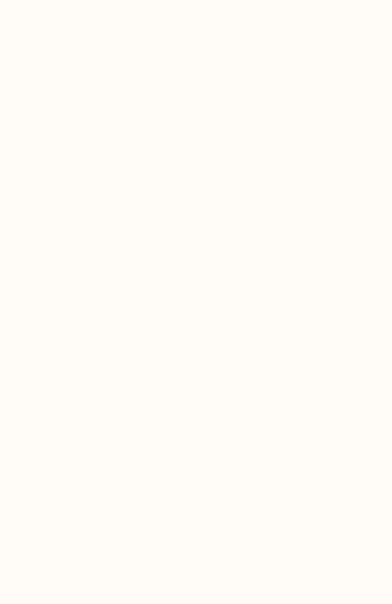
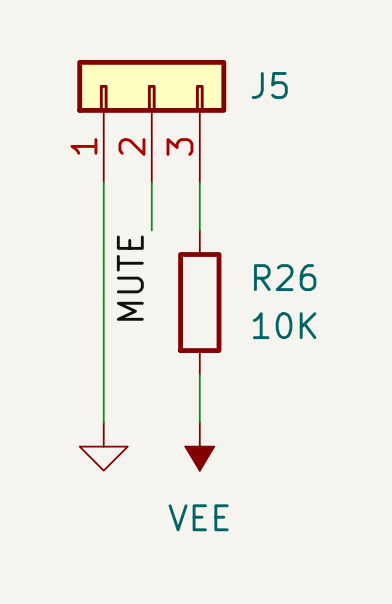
J5: none -> (151, 121)
wire: none -> (103, 182) (103, 422)
wire: none -> (151, 182) (151, 230)
wire: none -> (199, 182) (199, 230)
label: none -> MUTE (130, 278)
R26: none -> 10K (199, 302)
wire: none -> (199, 374) (199, 422)
power symbol: none -> (103, 446)
power symbol: none -> VEE (199, 446)

